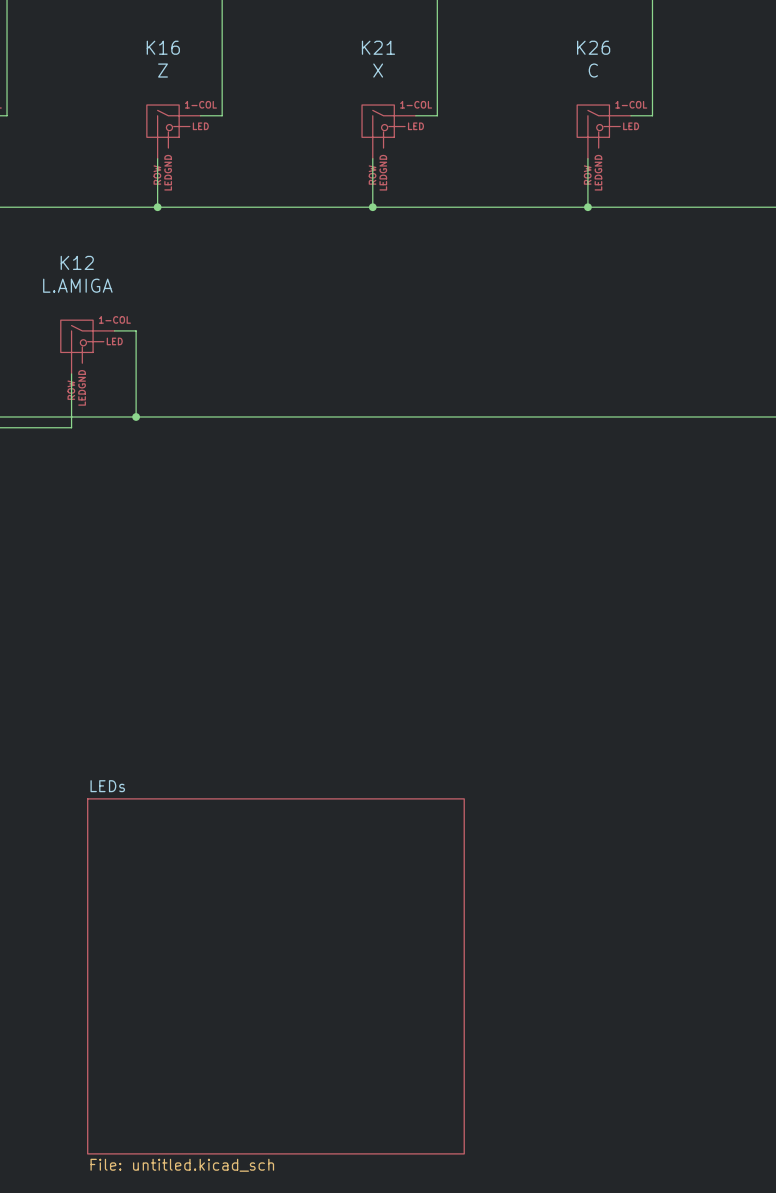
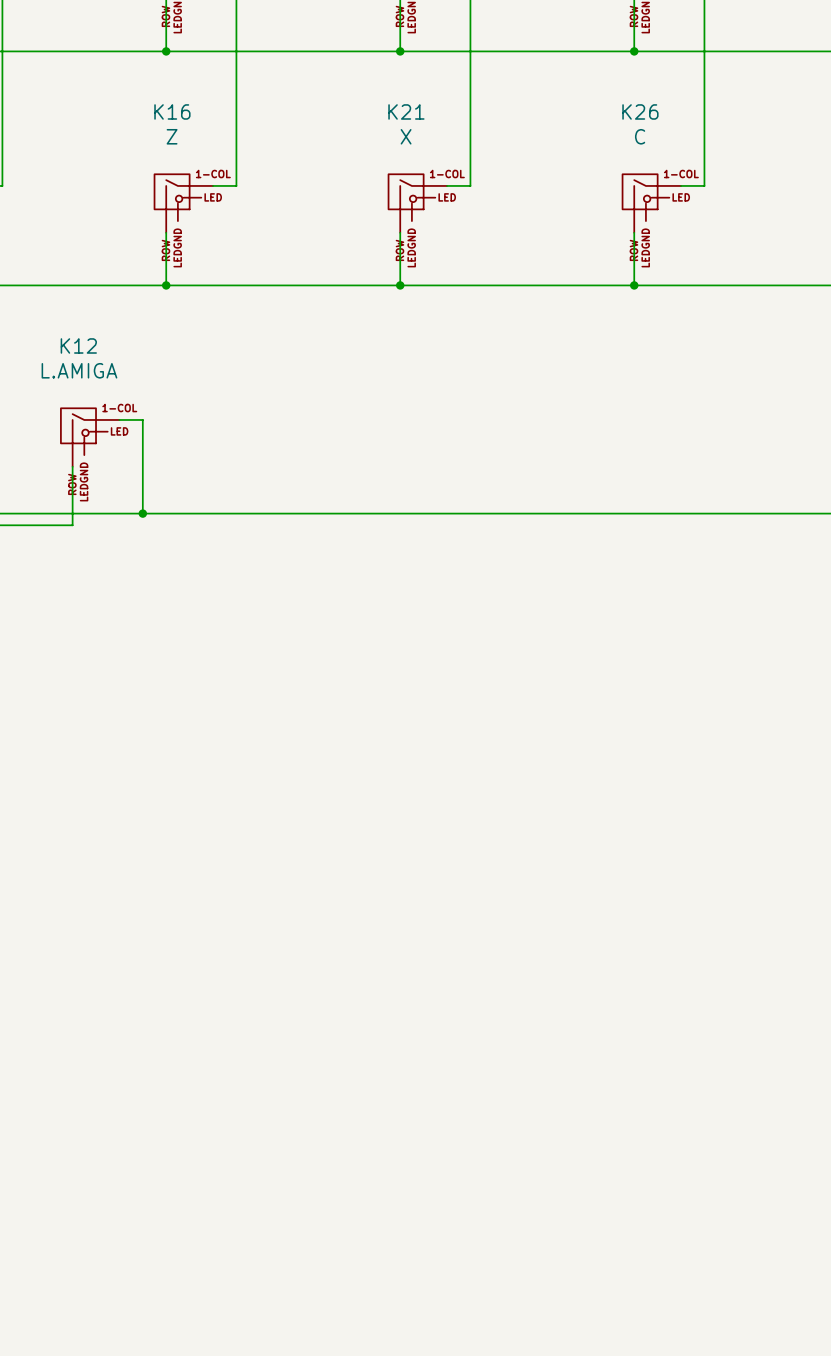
sheet LEDs: File: untitled.kicad_sch (275, 976) -> none

